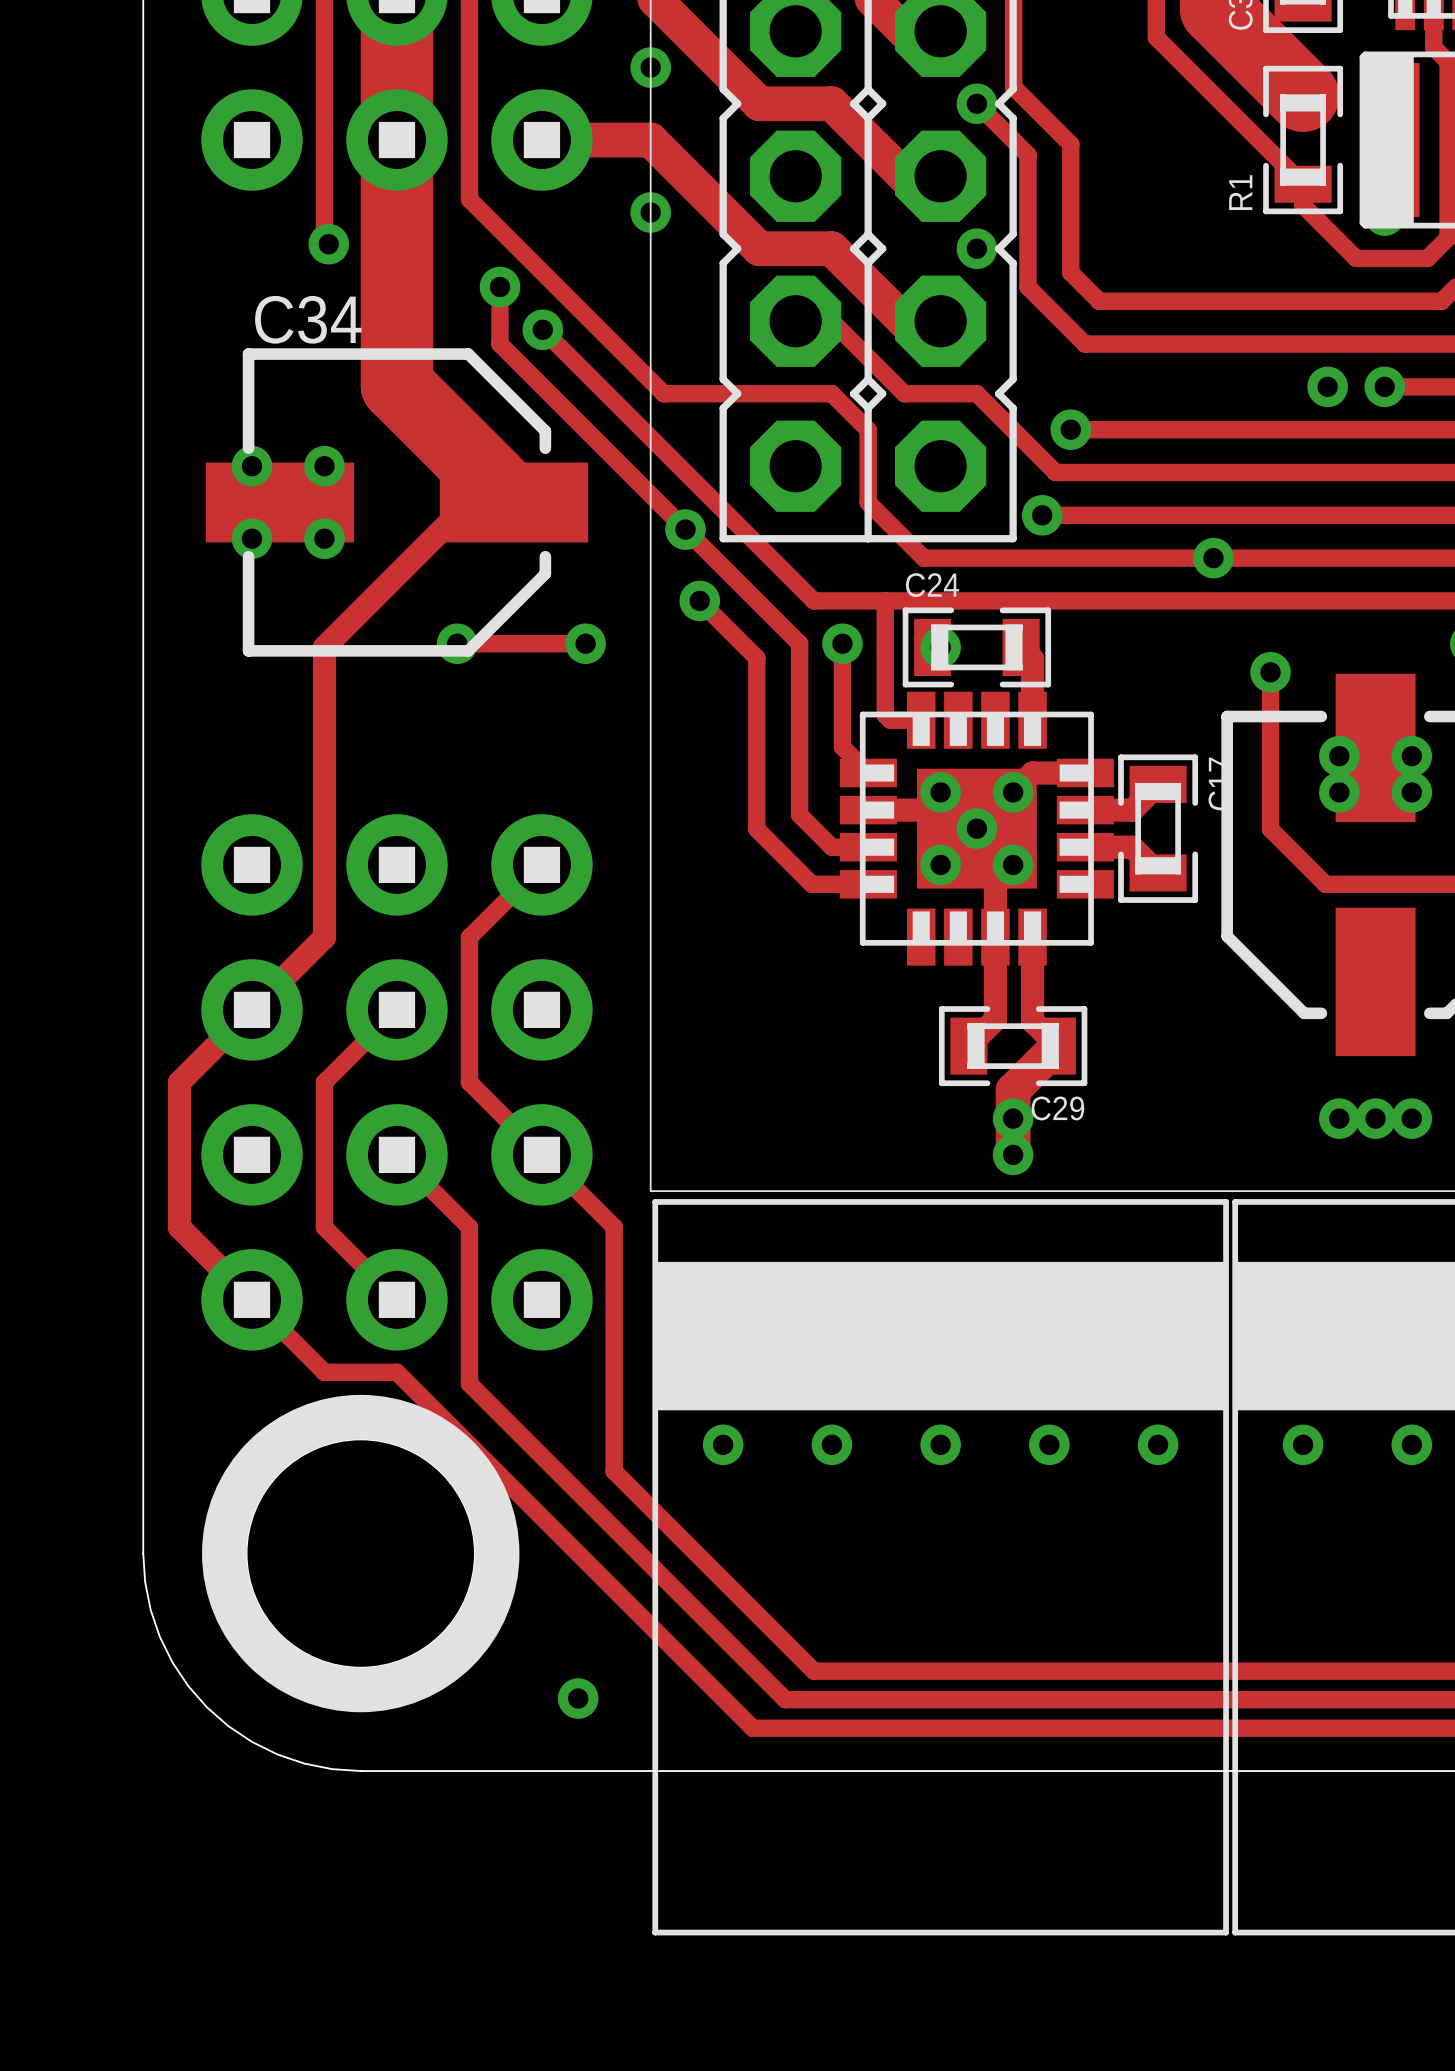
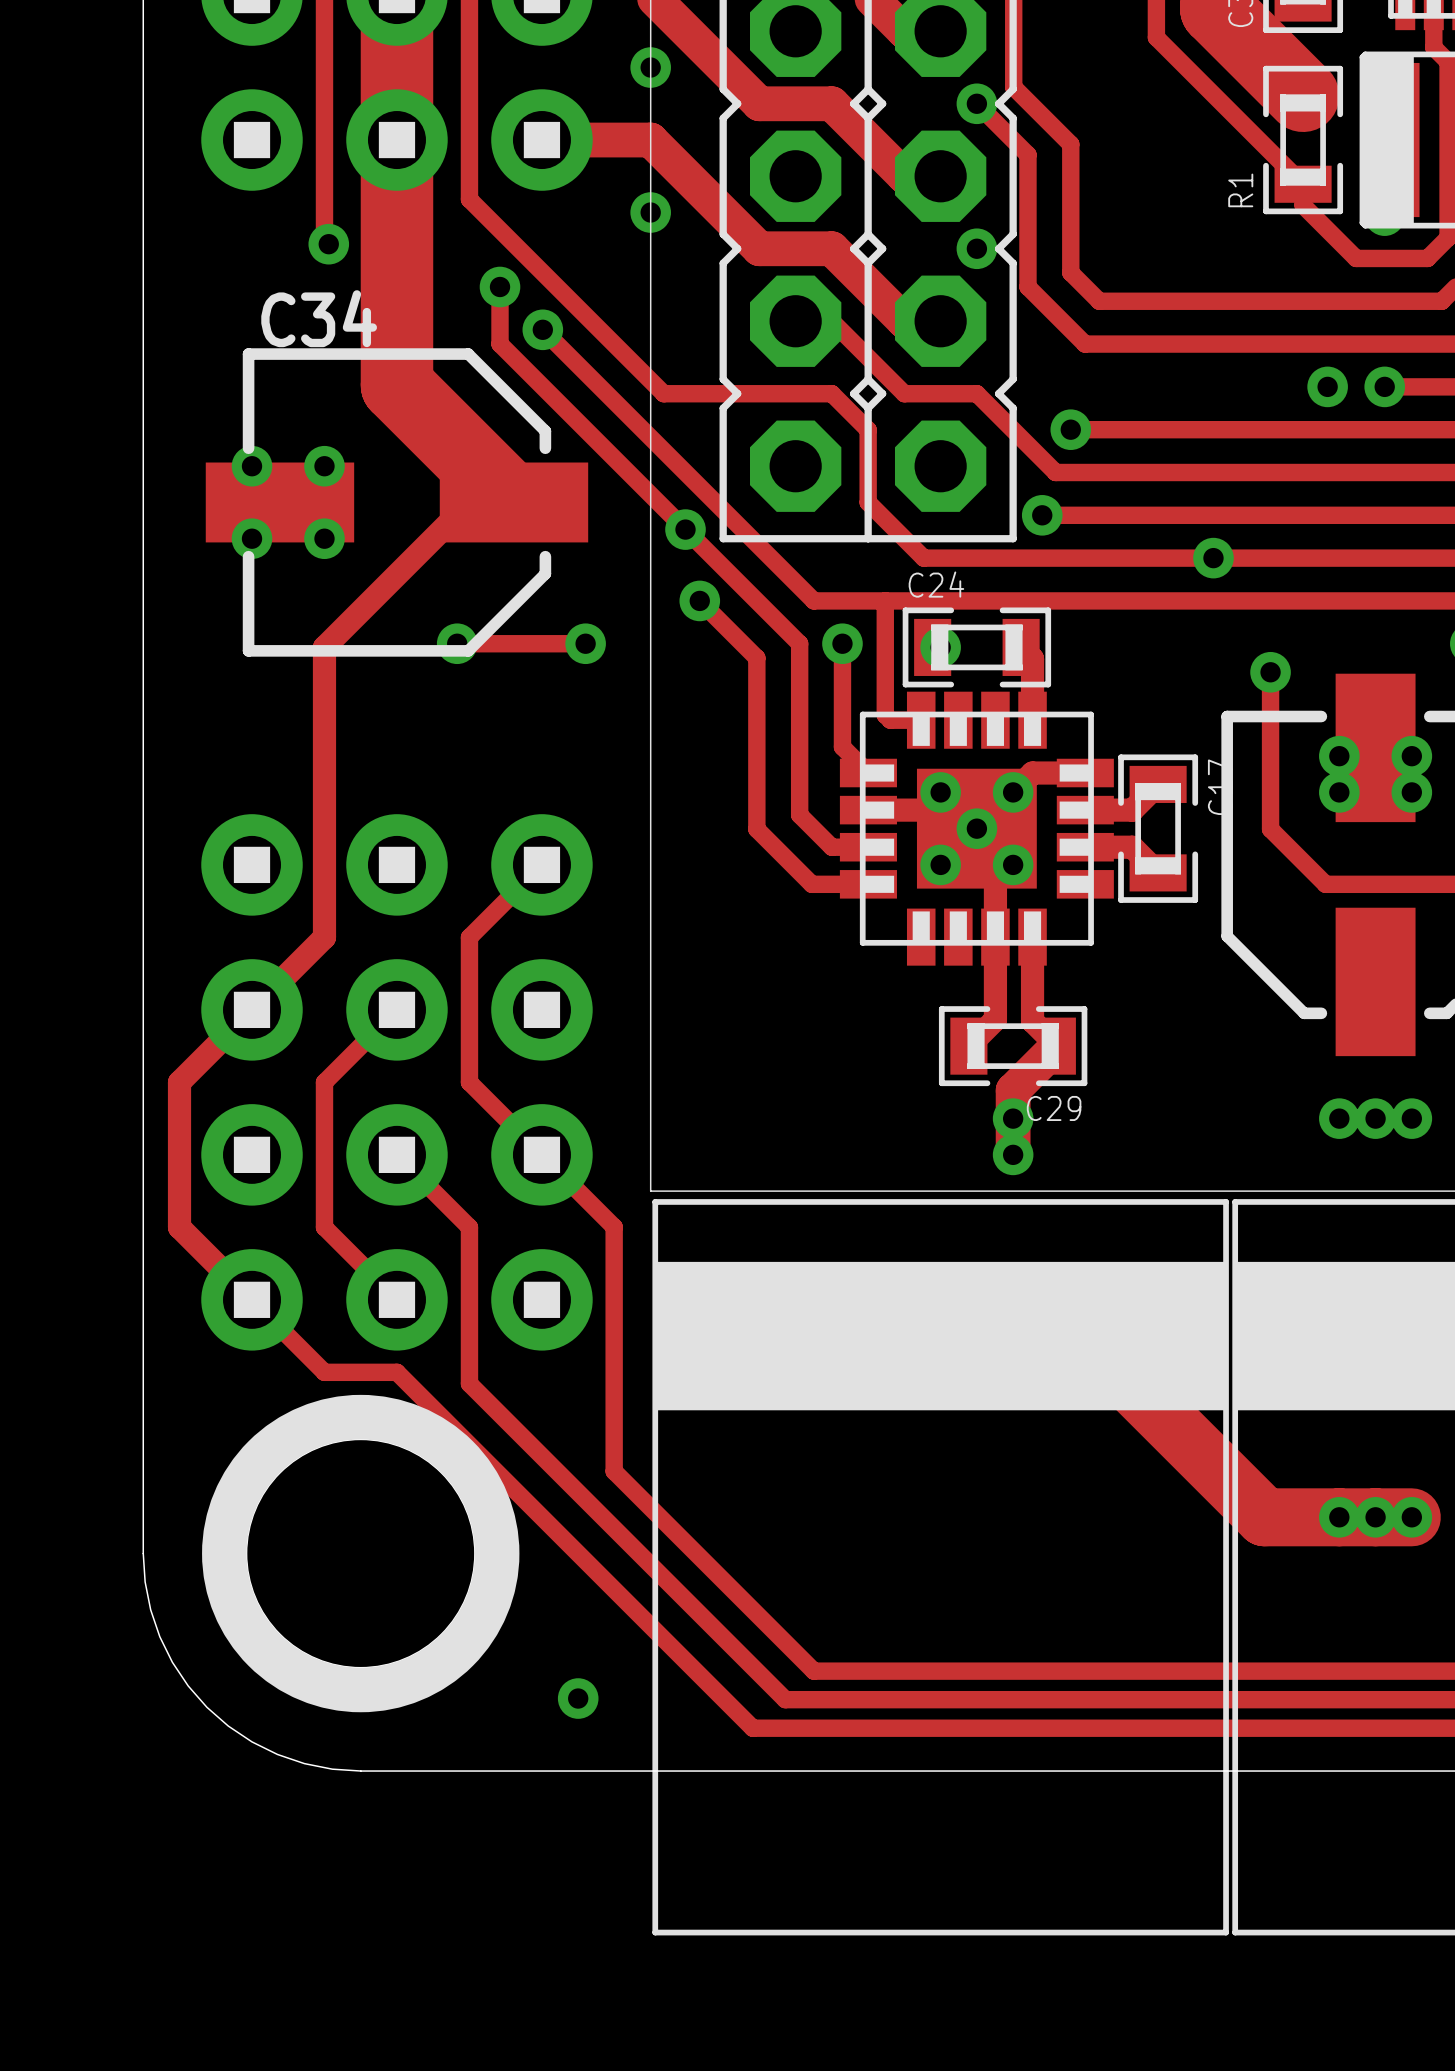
track: none -> (1083, 1336) (1264, 1517) (1411, 1517)
via: (723, 1444) -> none
via: (831, 1444) -> none
via: (940, 1444) -> none
via: (1049, 1444) -> none
via: (1158, 1444) -> none
via: (1303, 1444) -> none
via: (1411, 1444) -> none
via: none -> (1339, 1517)
via: none -> (1375, 1517)
via: none -> (1411, 1517)

